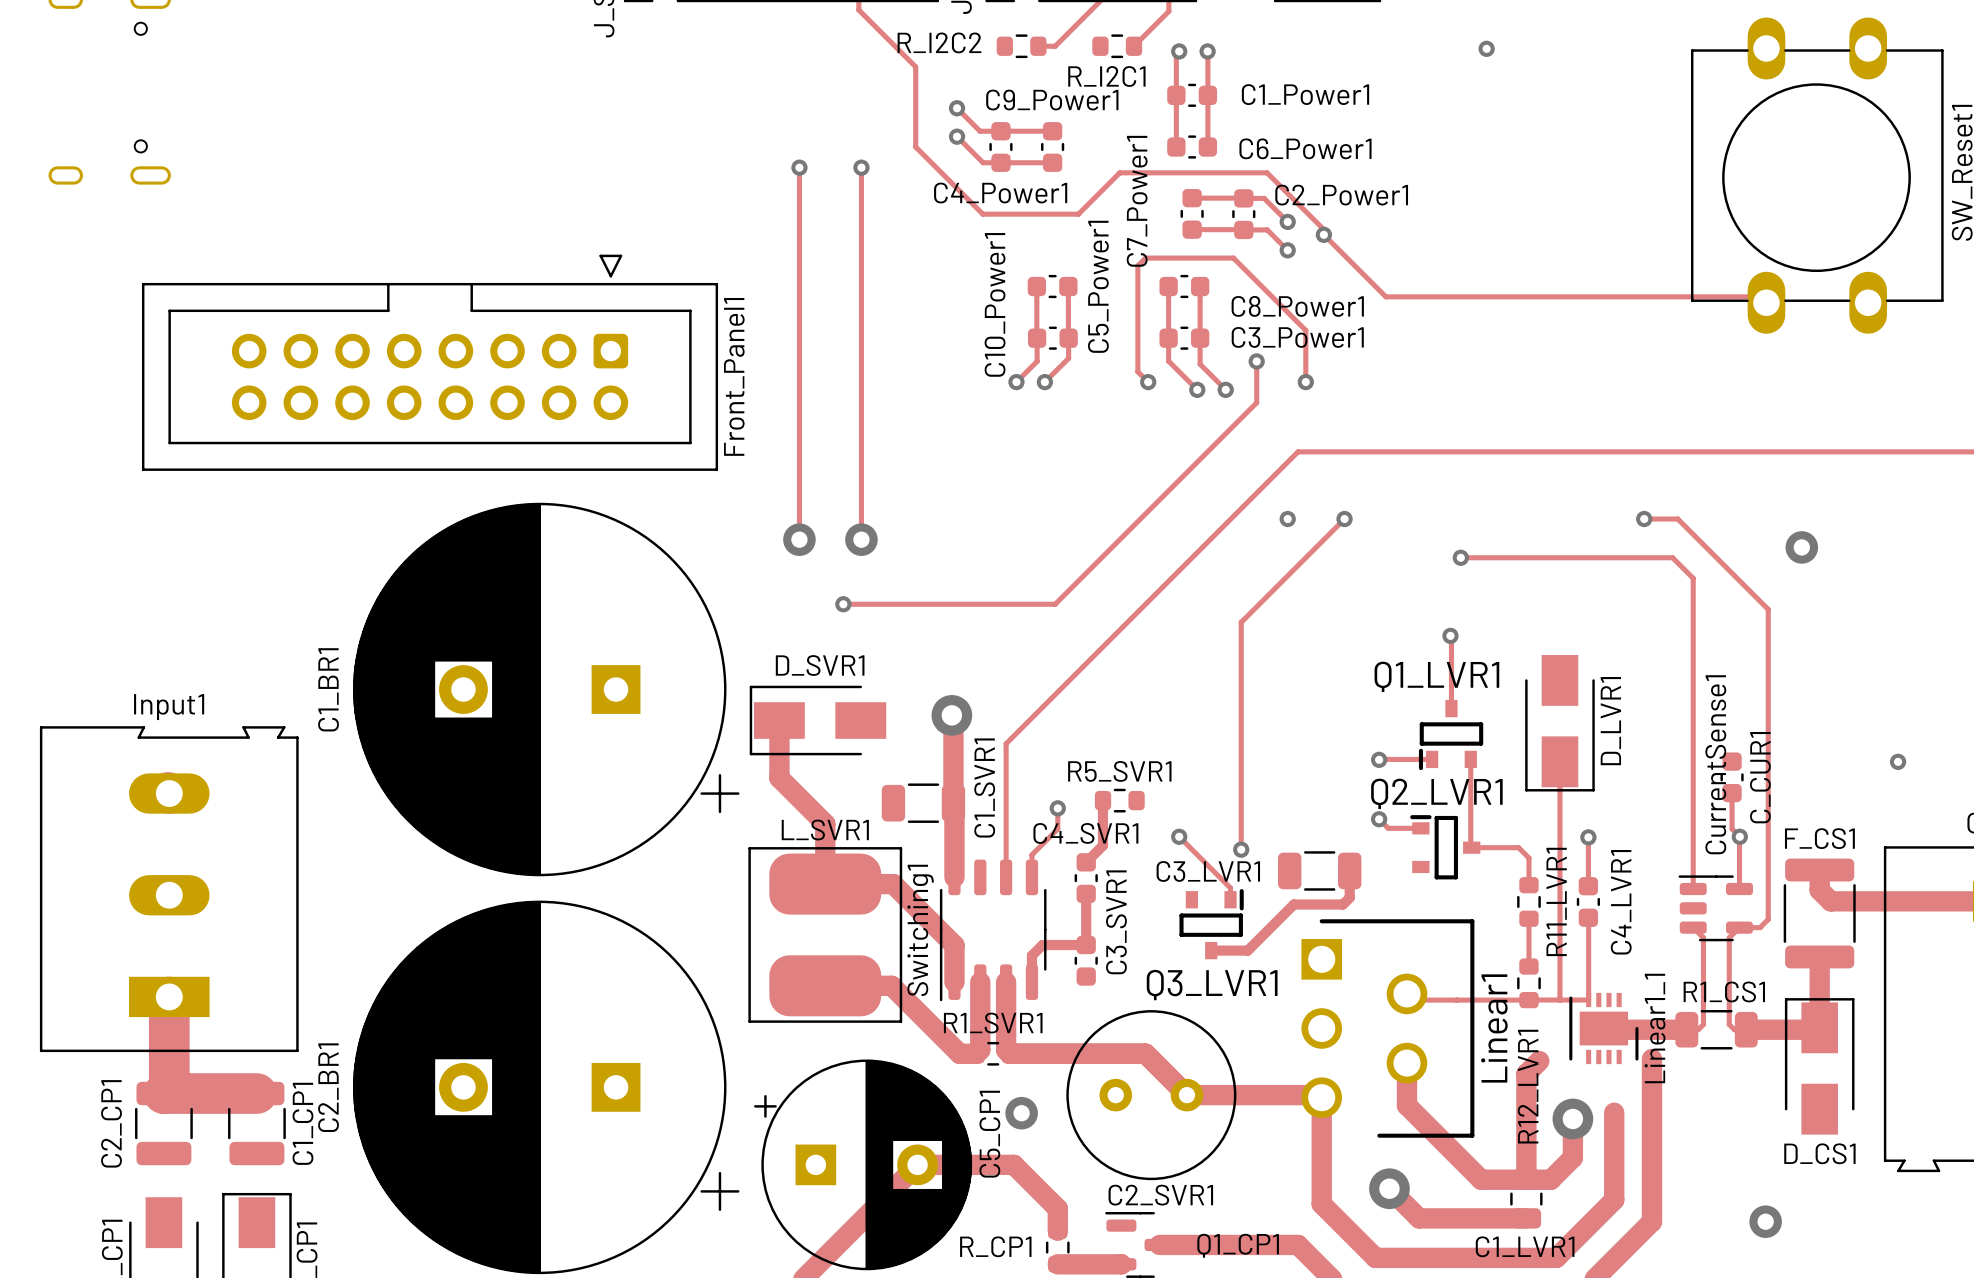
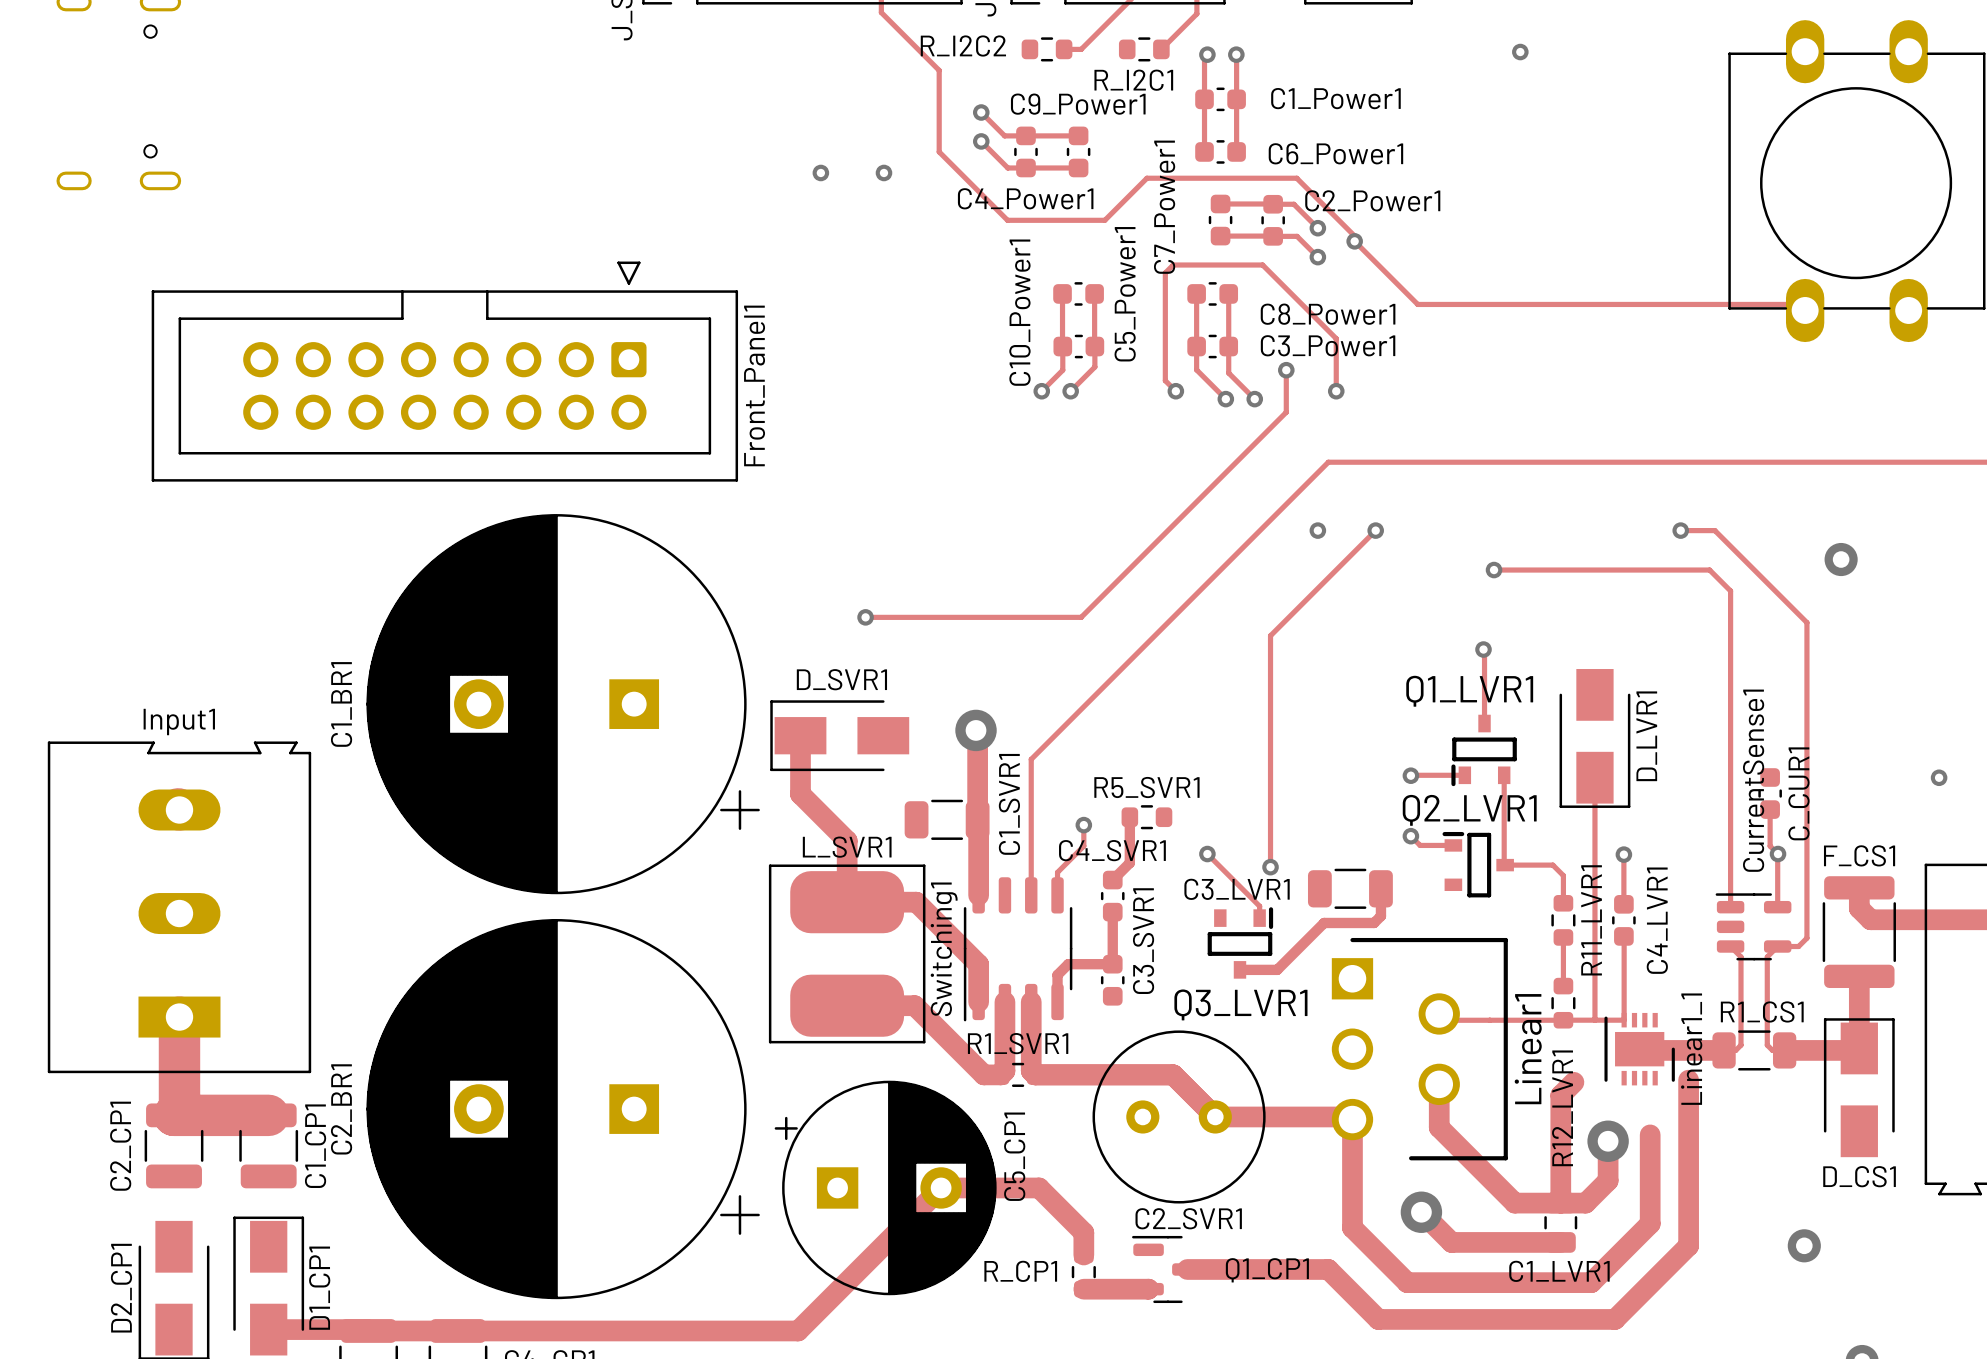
track: (799, 167) (799, 539) -> none
track: (861, 167) (861, 539) -> none
via: (799, 539) -> none
via: (861, 539) -> none
via: (1021, 1113) -> none

